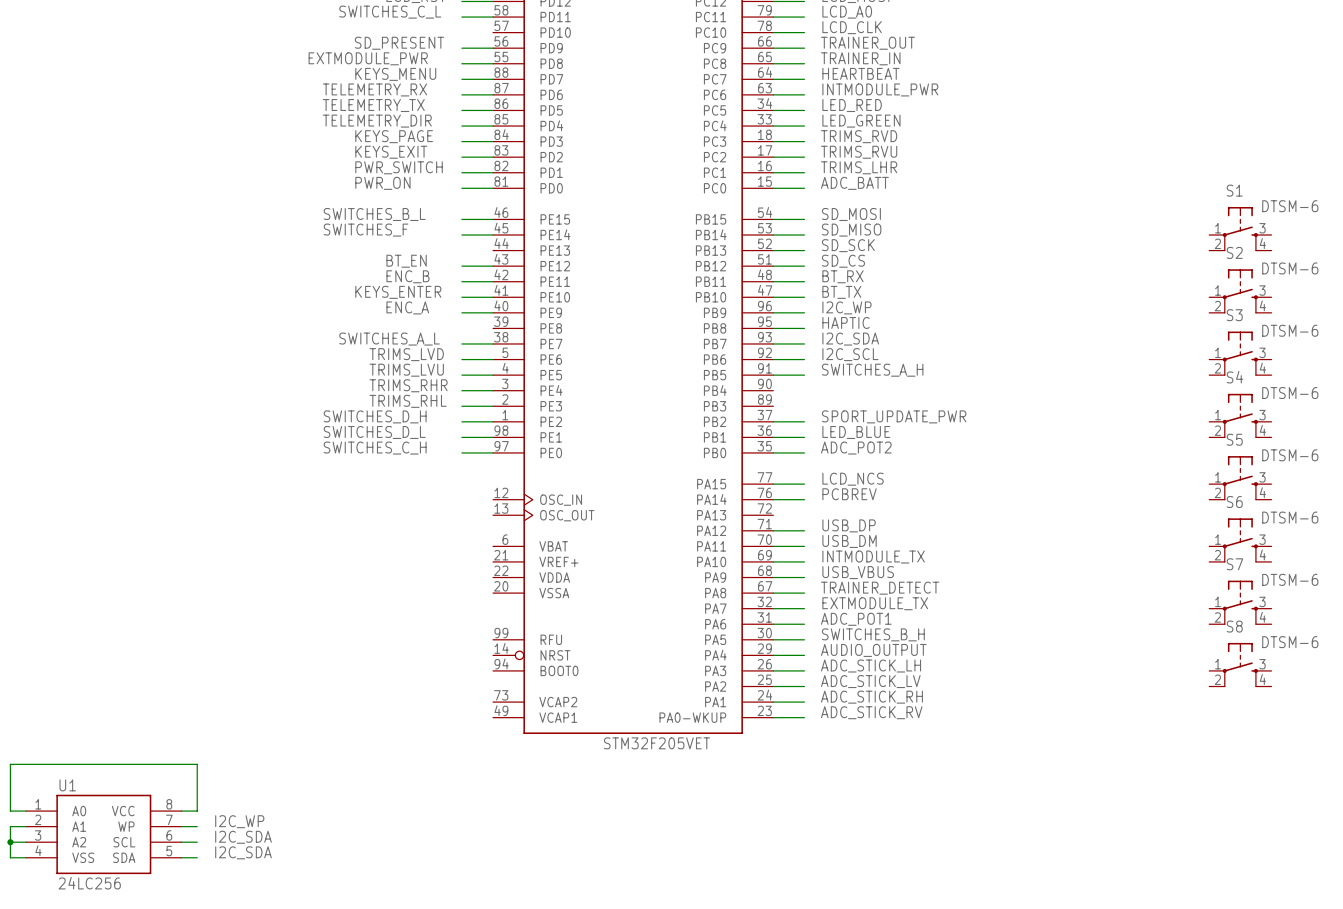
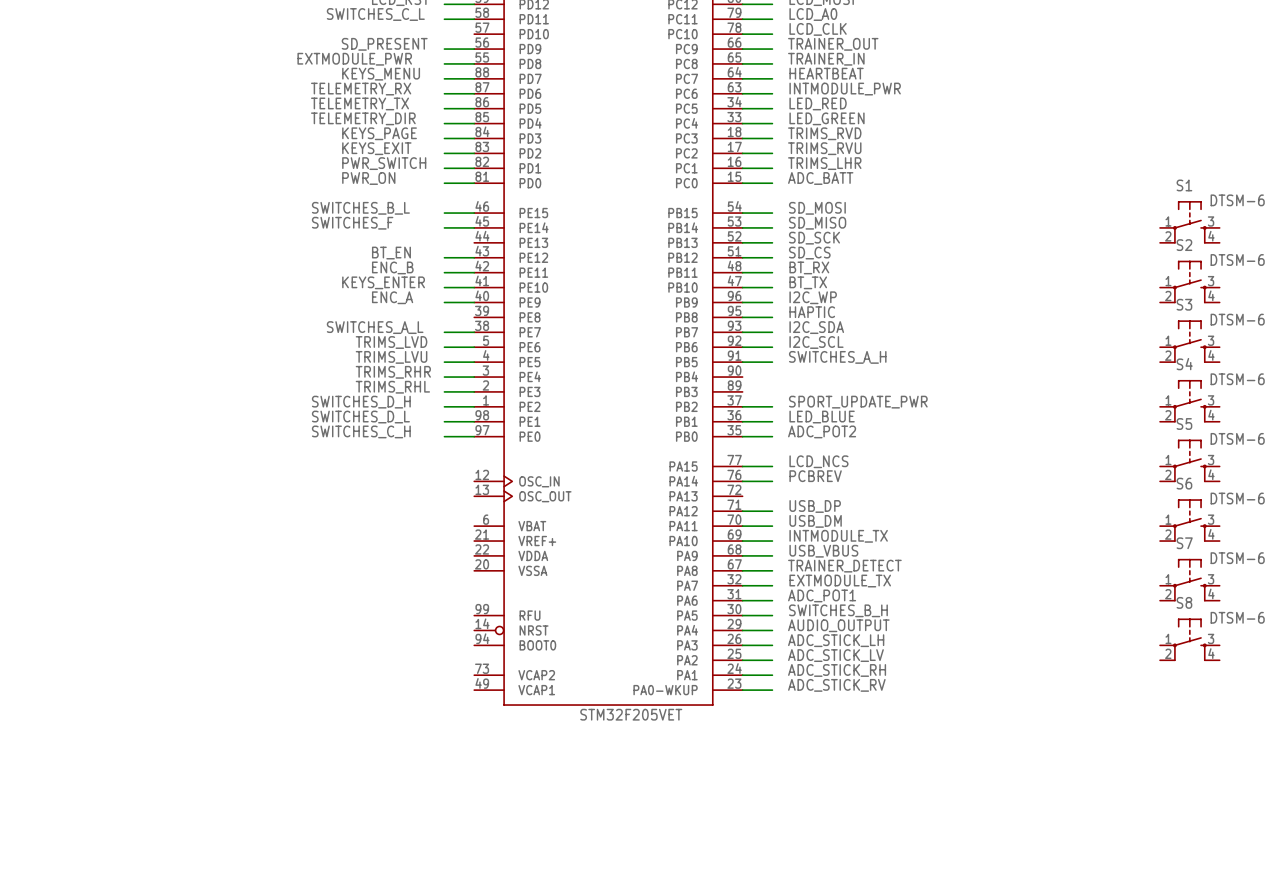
wire: (25, 811) (10, 811) (10, 764) (197, 764) (197, 811) (181, 811) -> none
label: I2C_WP (239, 821) -> none
wire: (25, 826) (10, 826) (10, 857) (25, 857) -> none
wire: (181, 826) (197, 826) -> none
U1: 24LC256 (103, 834) -> none
label: I2C_SDA (243, 837) -> none
wire: (10, 842) (25, 842) -> none
junction: (10, 842) -> none
wire: (181, 842) (197, 842) -> none
label: I2C_SDA (243, 852) -> none
wire: (181, 857) (197, 857) -> none

